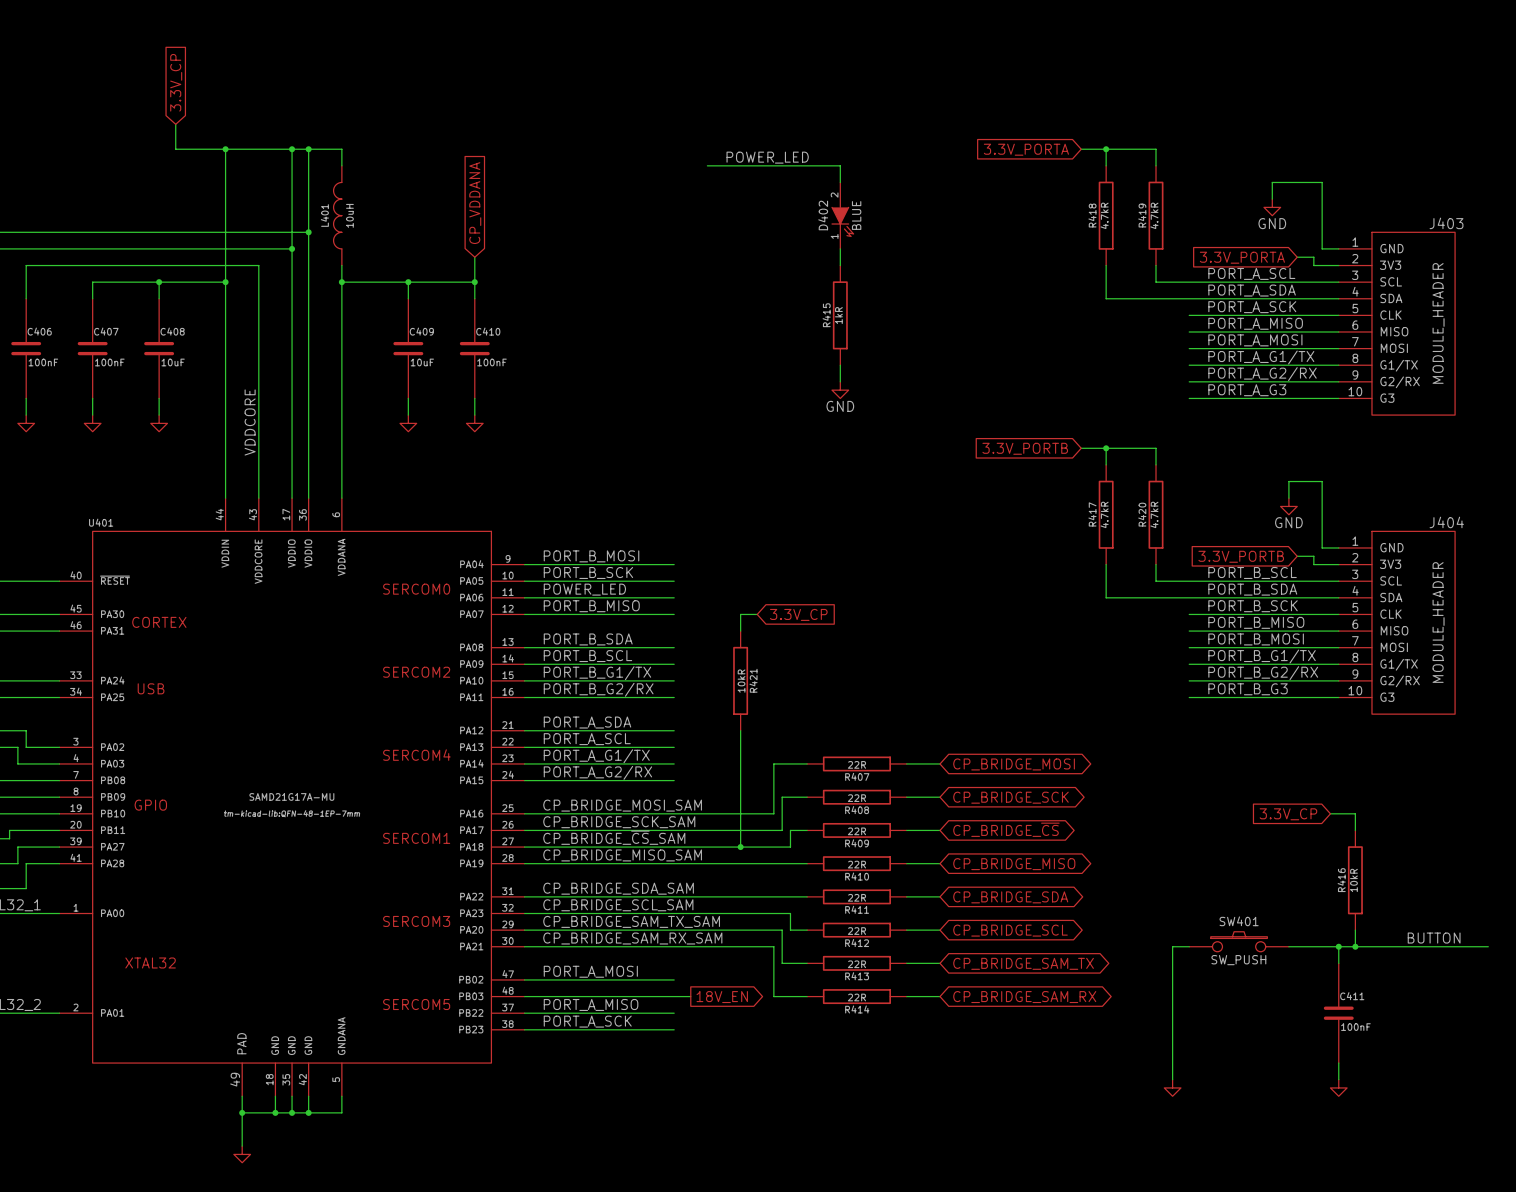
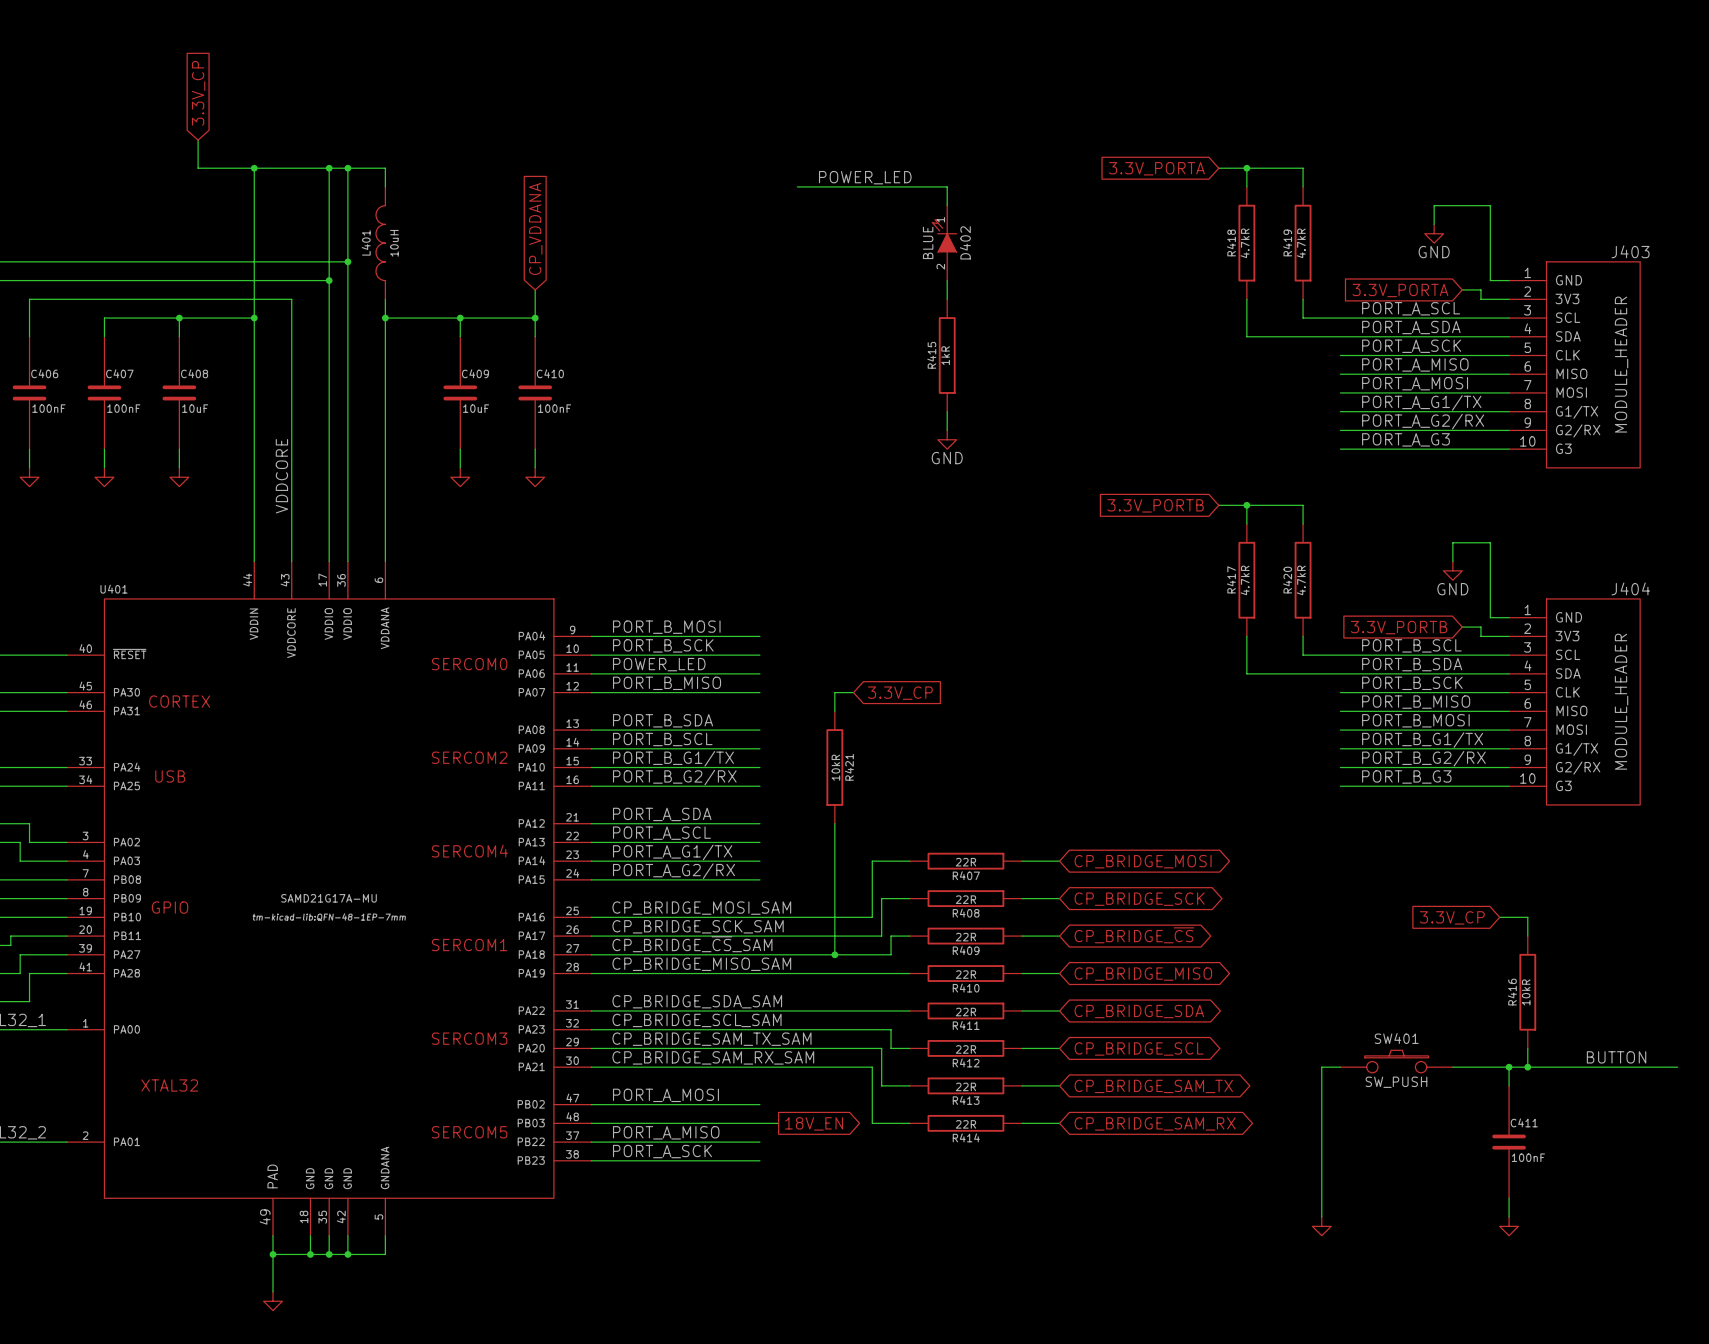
D402 rotation: 0° (842, 221) -> 180° (944, 236)

